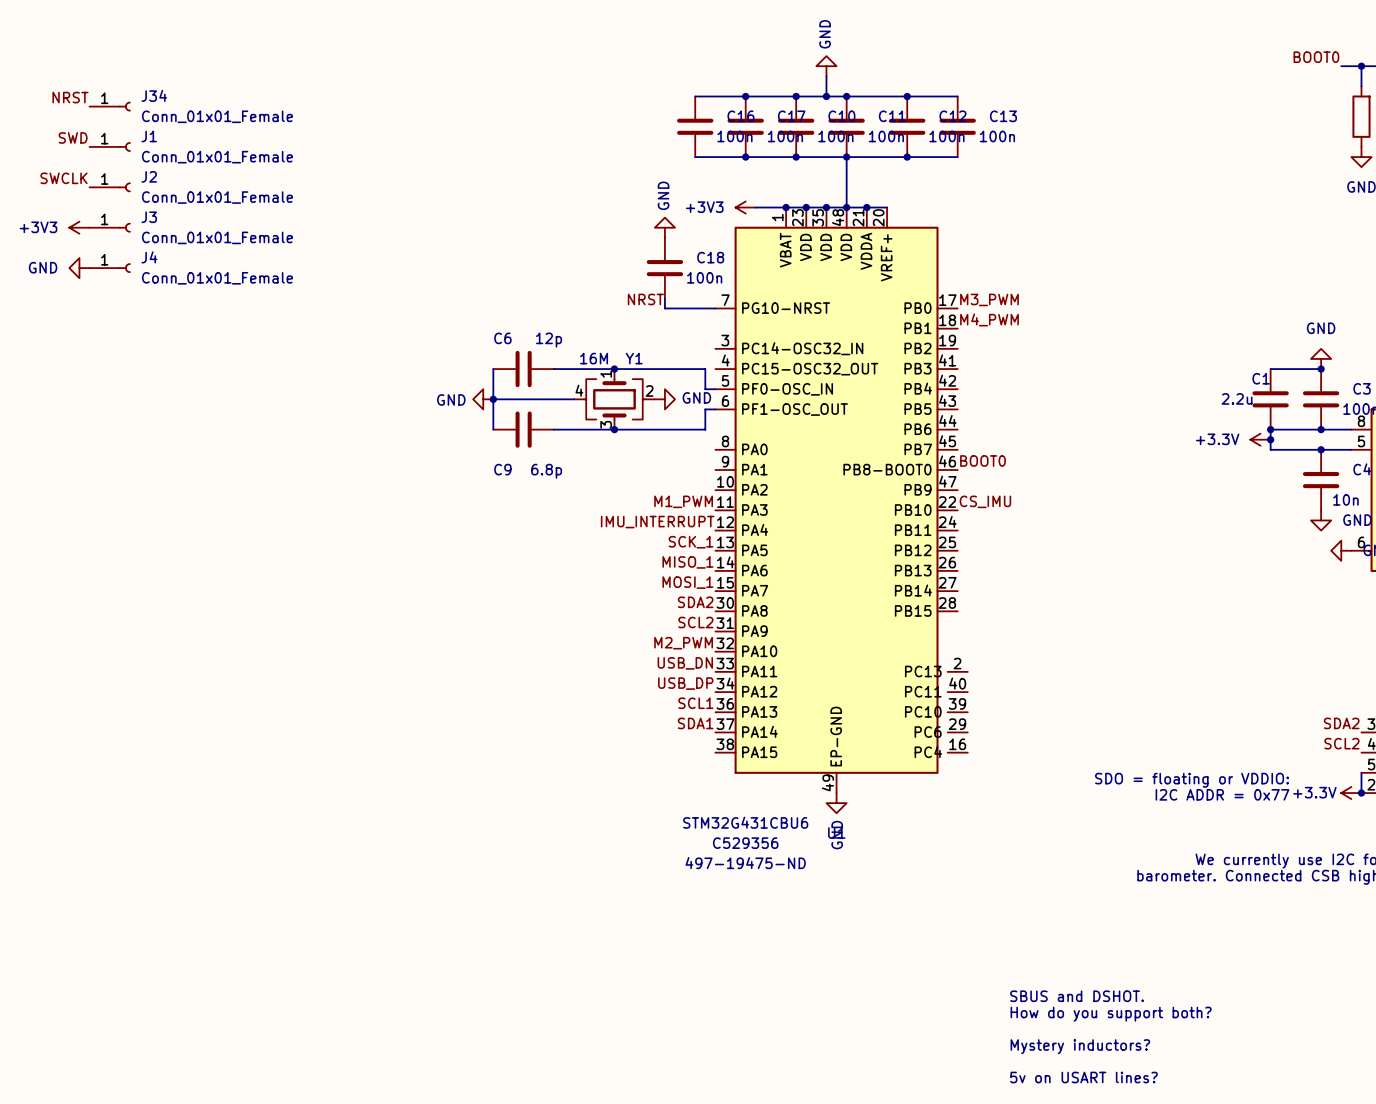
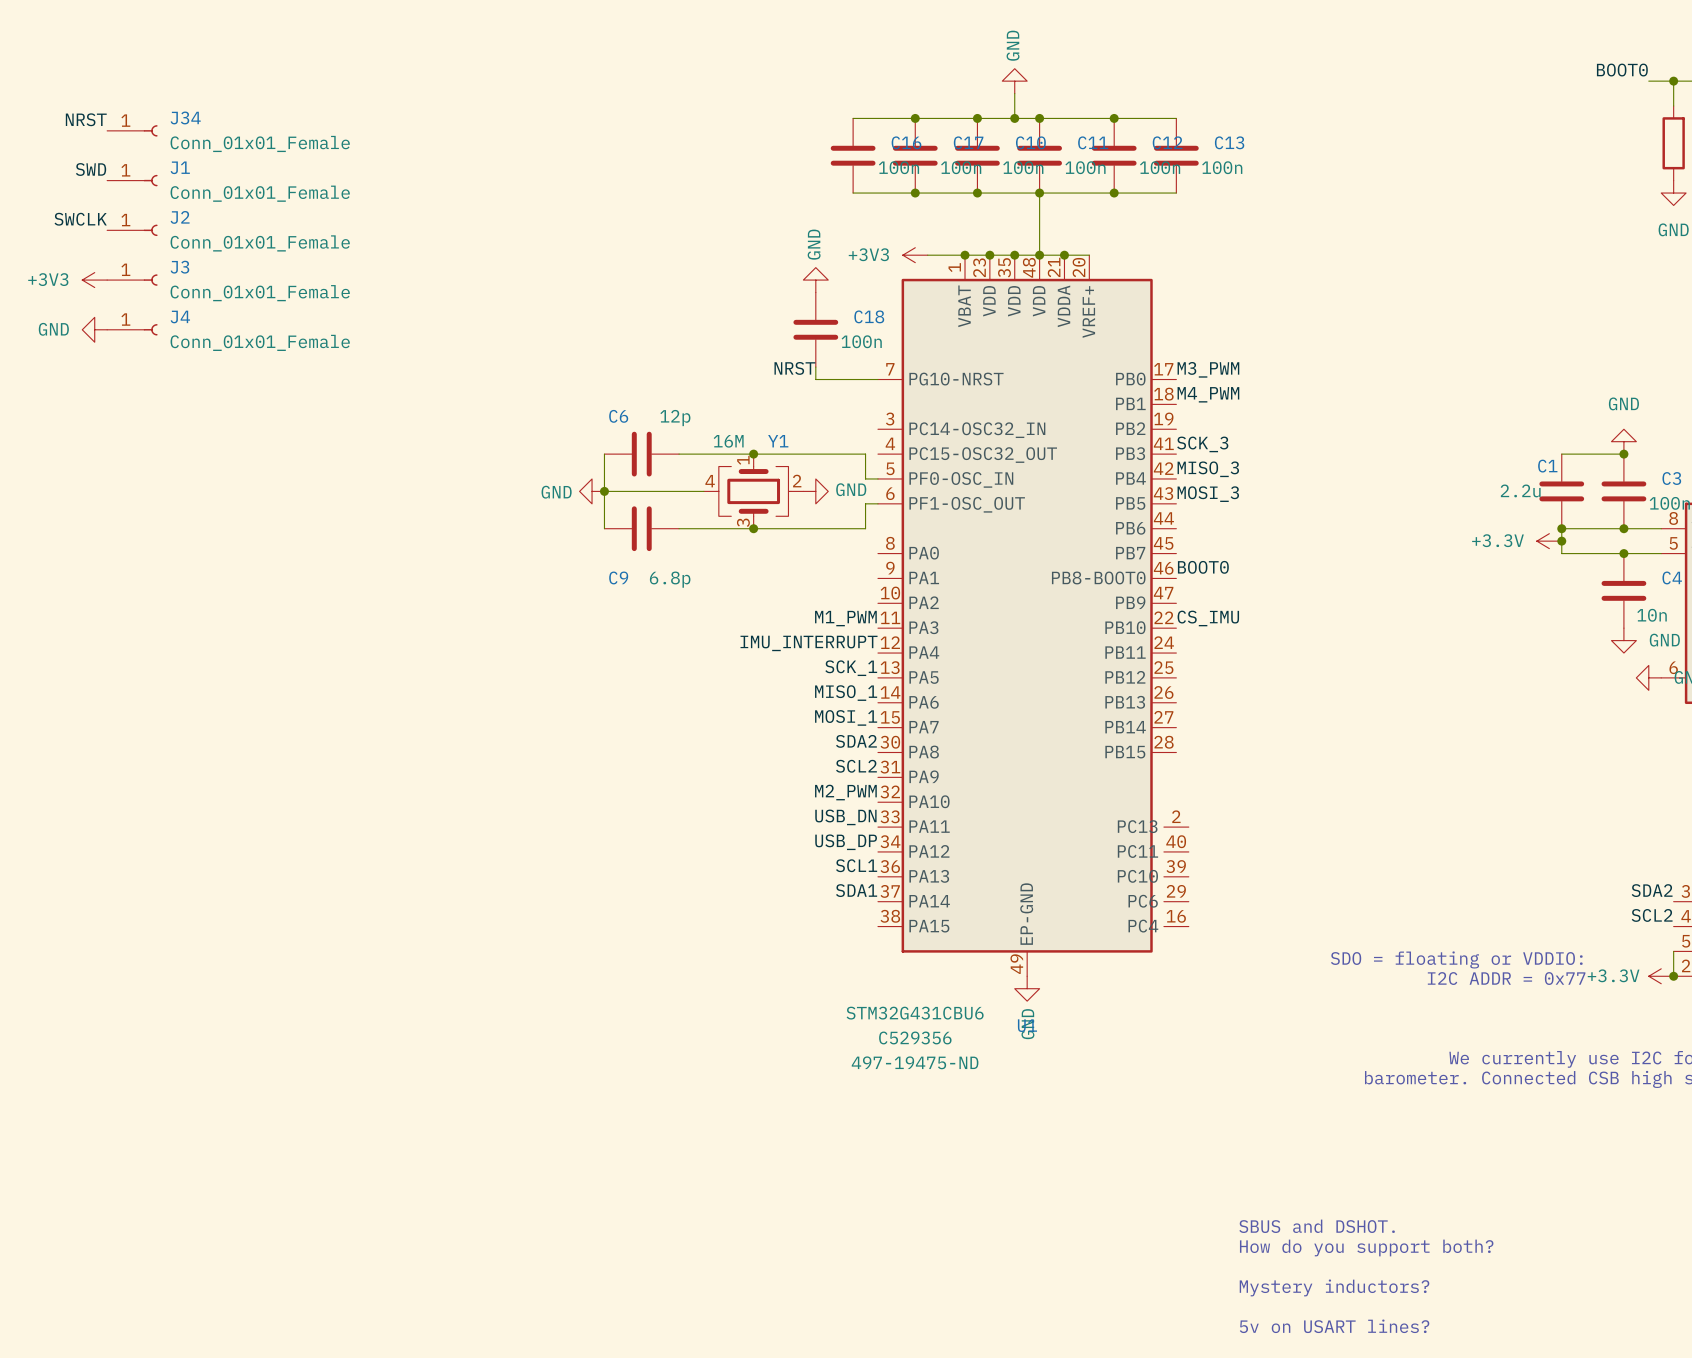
label: none -> SCK_3 (1202, 444)
label: none -> MISO_3 (1208, 469)
label: none -> MOSI_3 (1208, 494)

